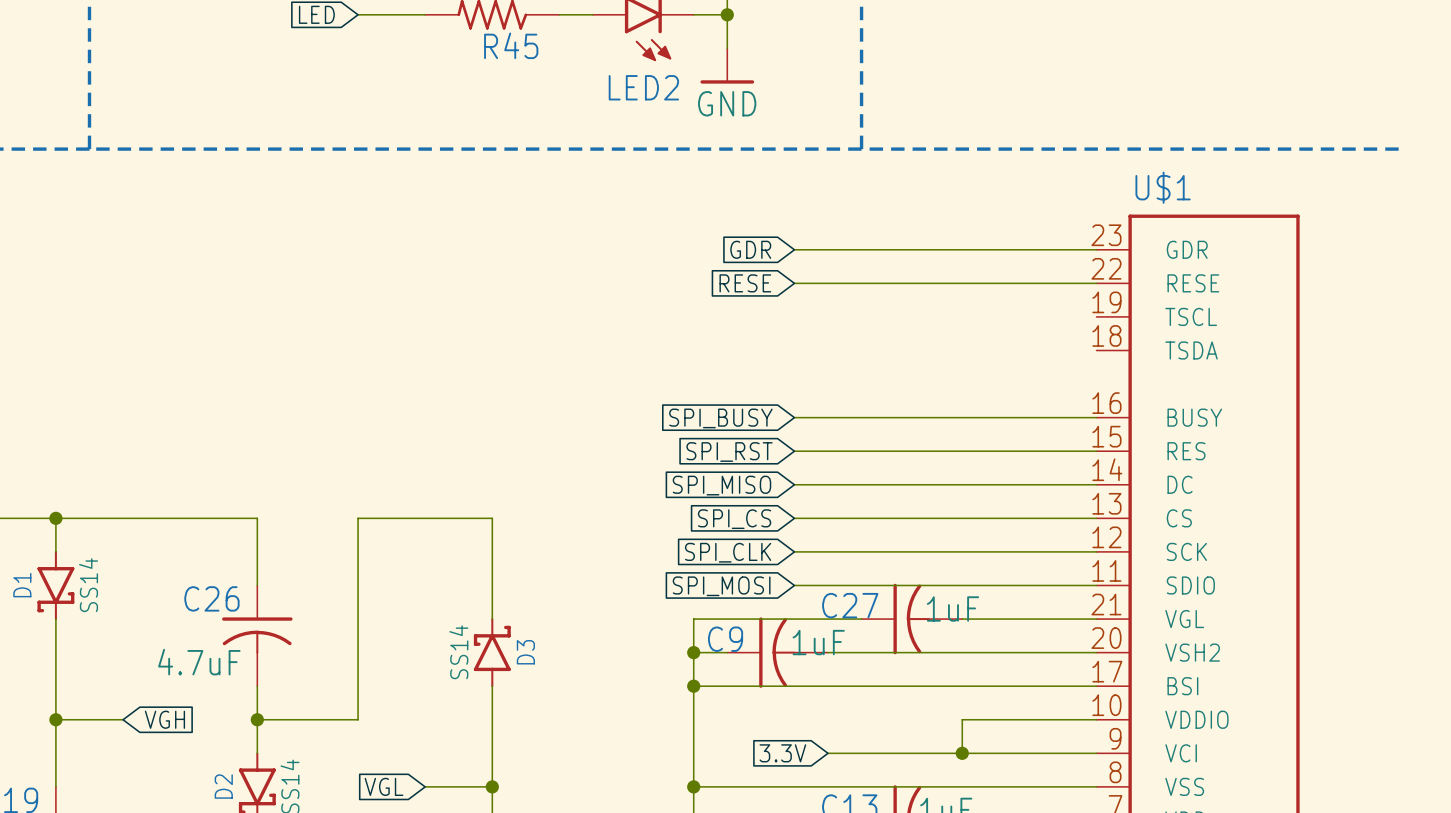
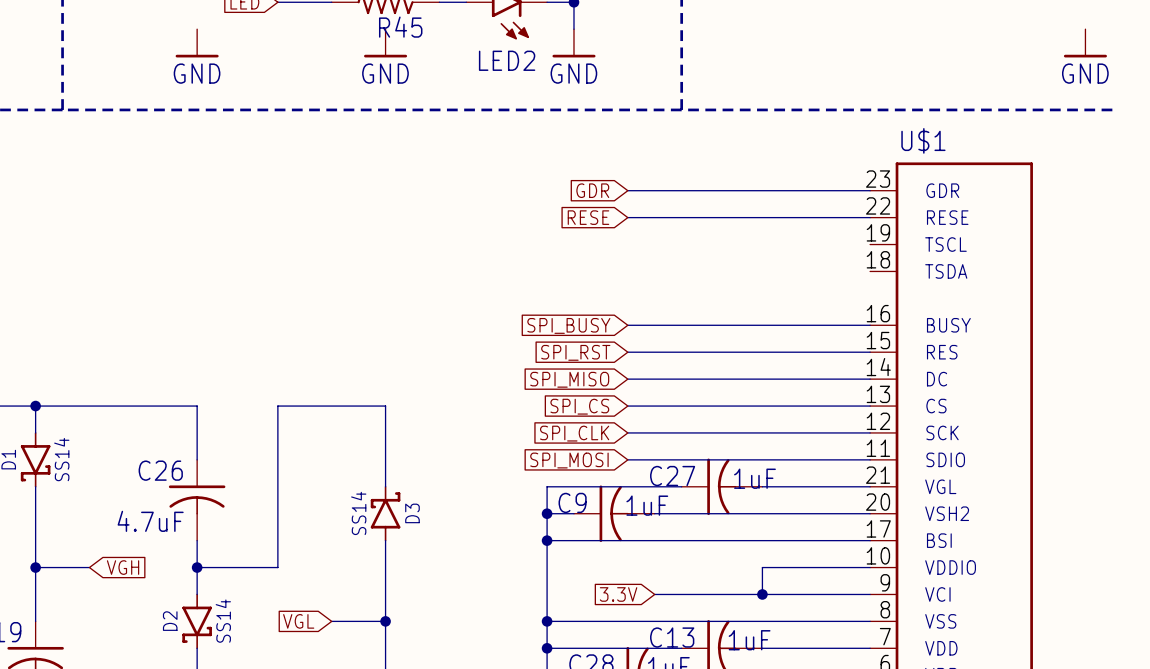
power symbol: none -> GND (197, 43)
power symbol: none -> GND (385, 43)
power symbol: none -> GND (1085, 43)

